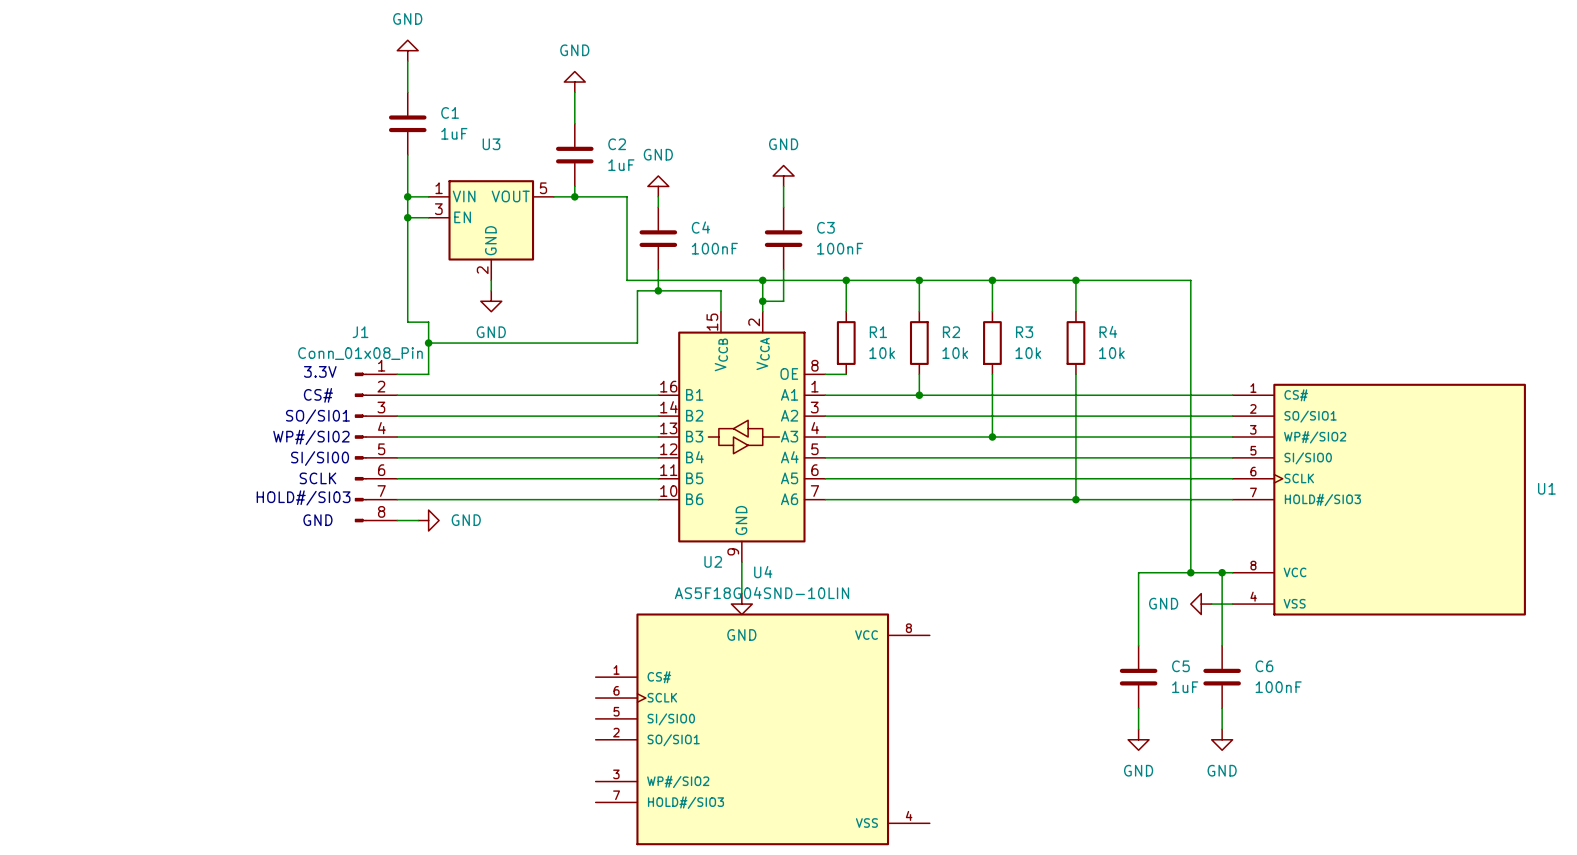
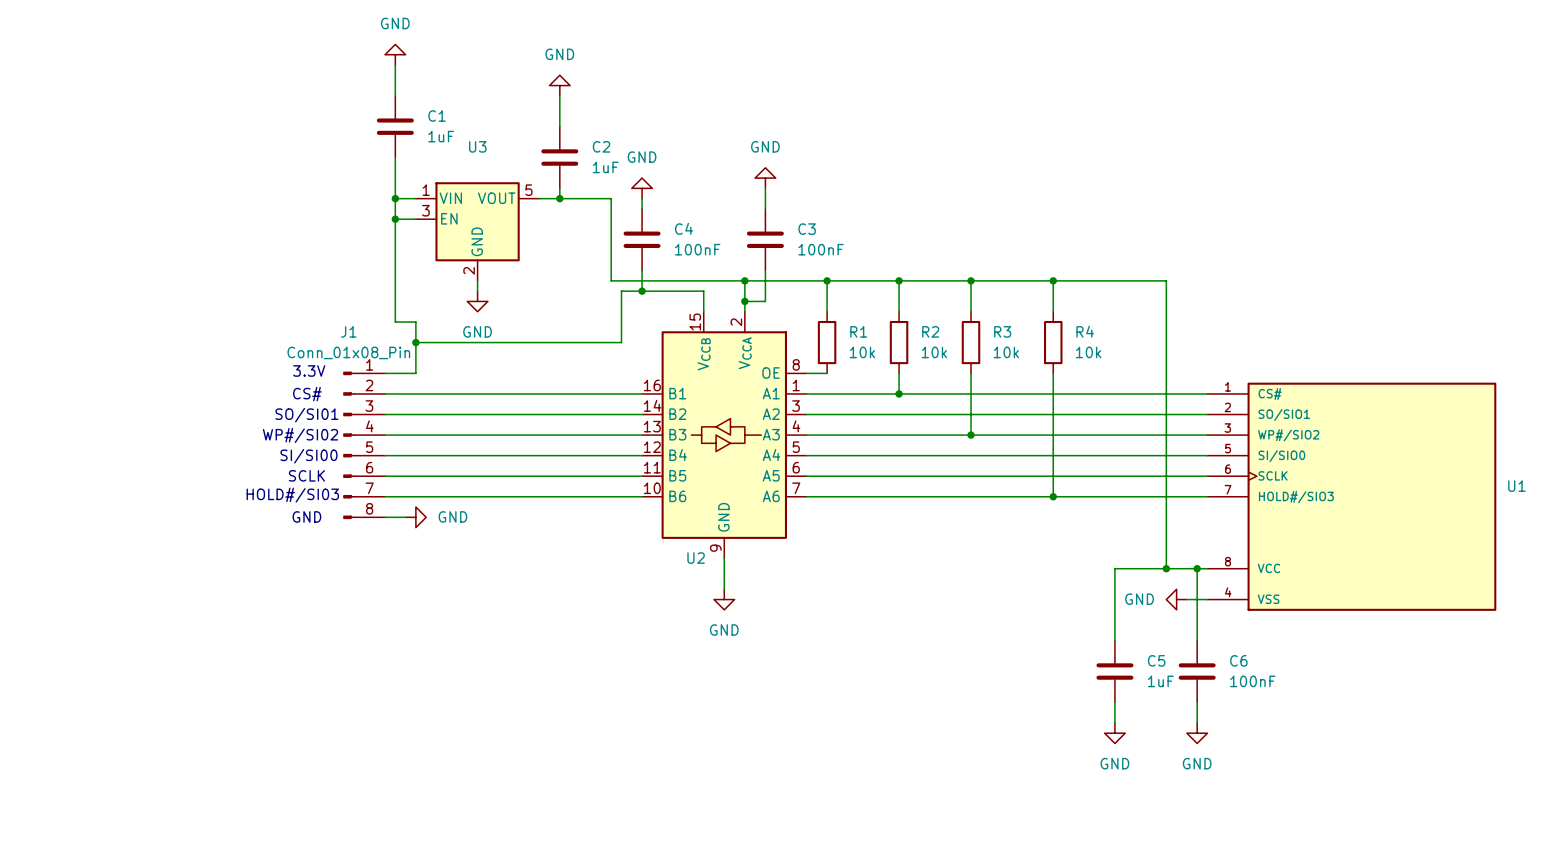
U4: AS5F18G04SND-10LIN (762, 729) -> none

